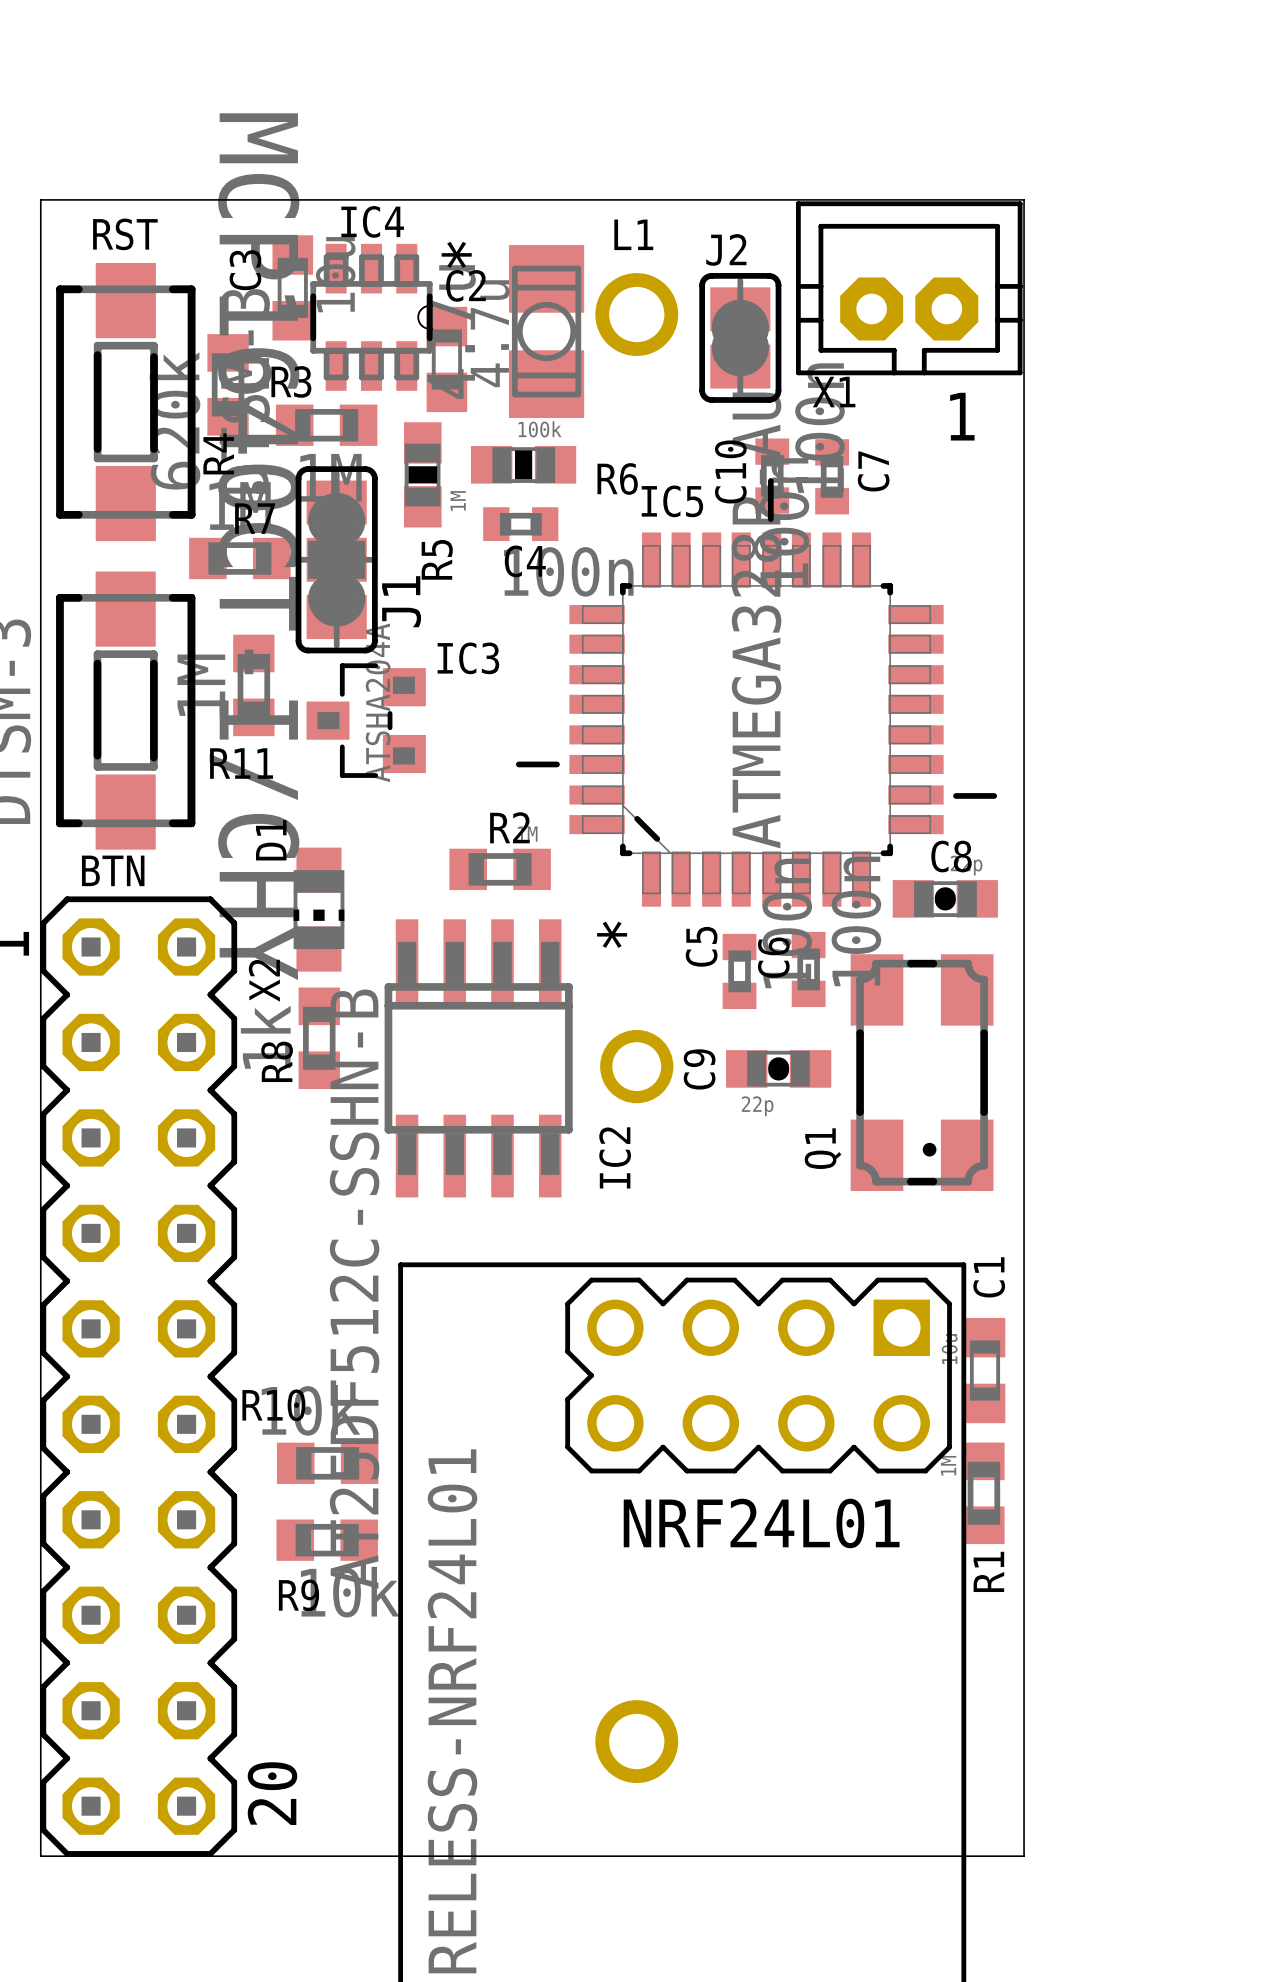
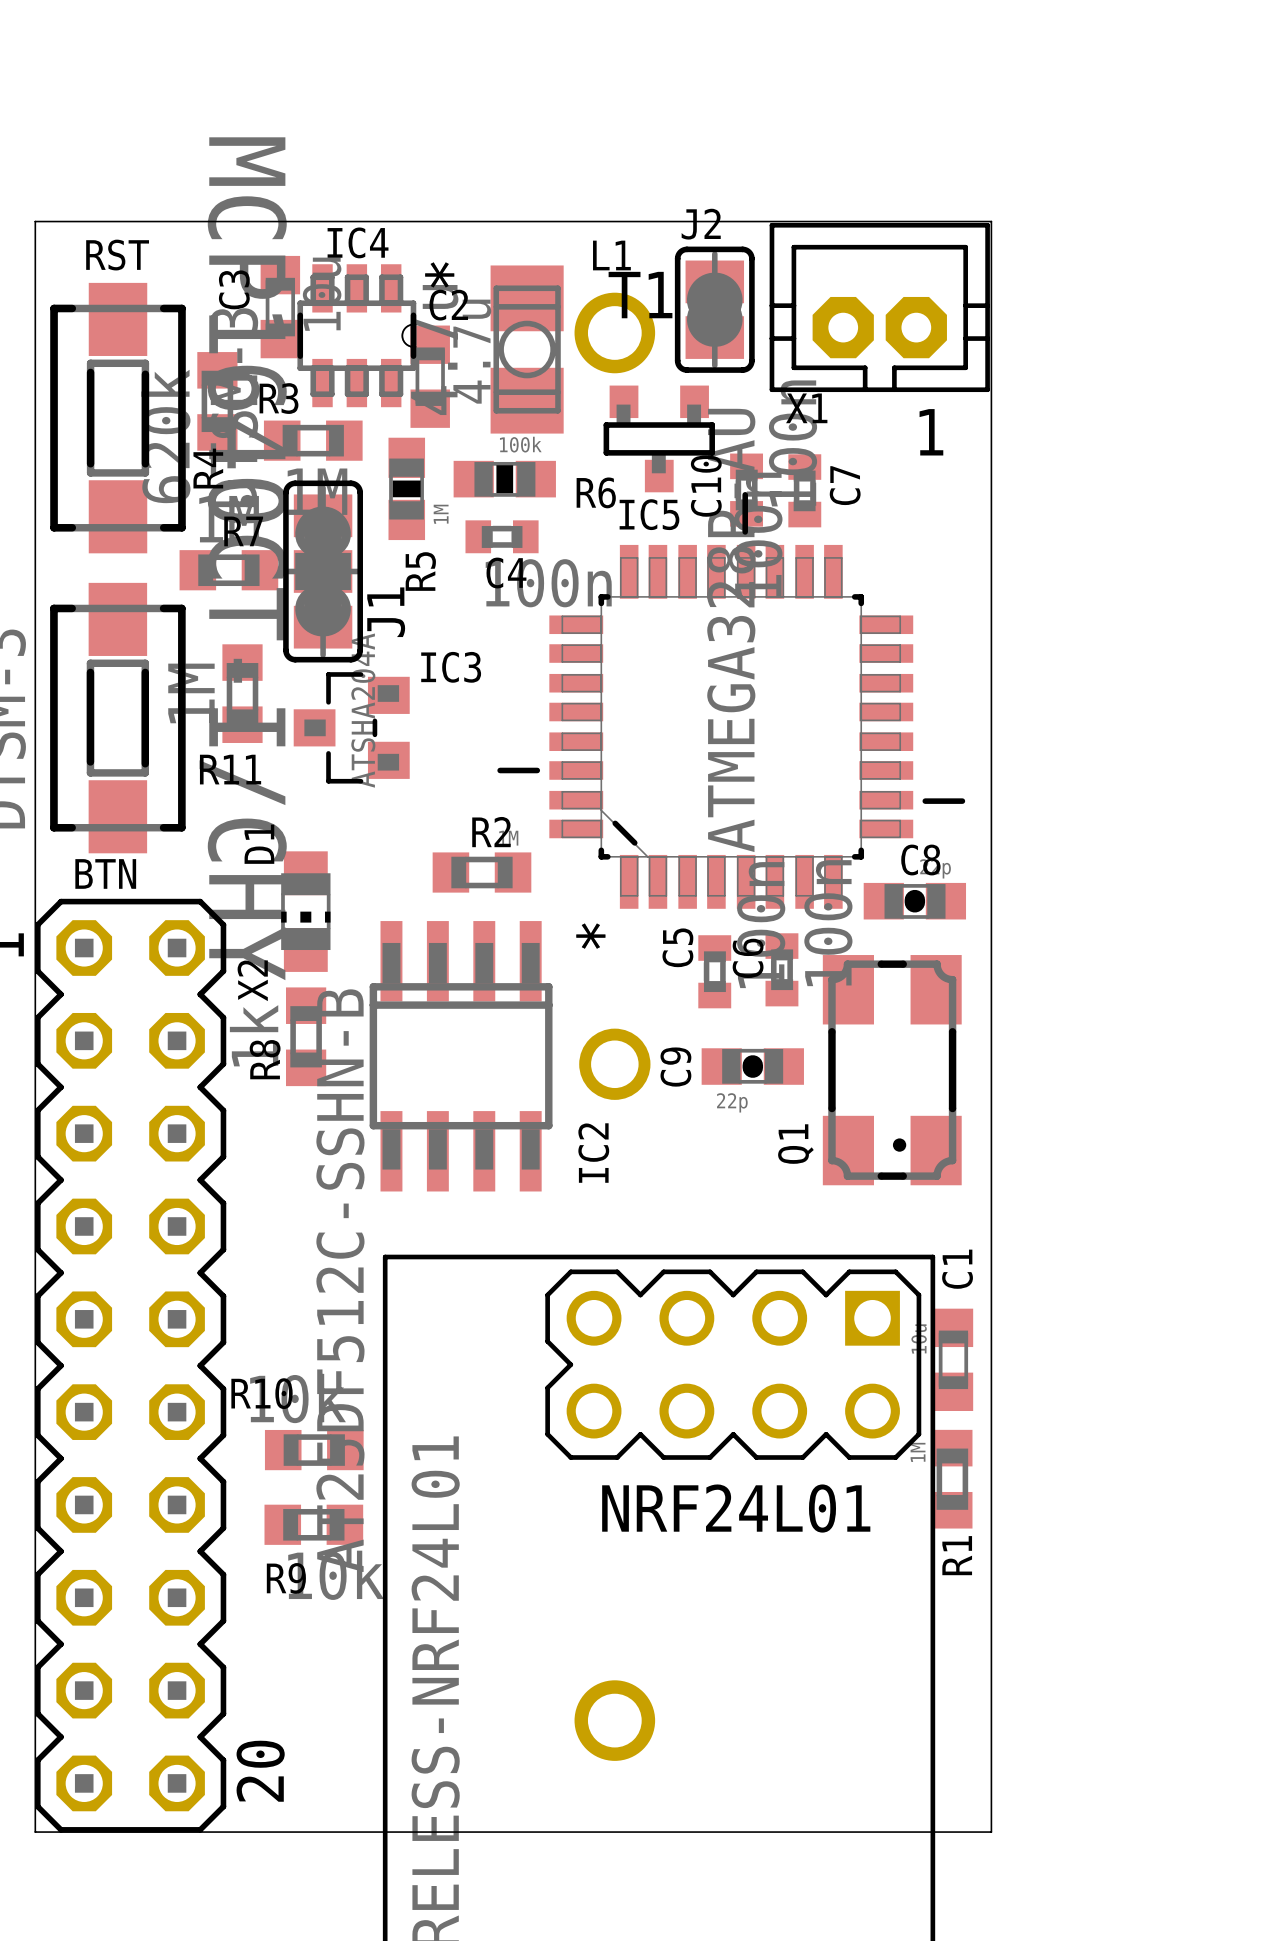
J2 position: (740, 337) -> (714, 309)
T1: none -> (659, 438)

